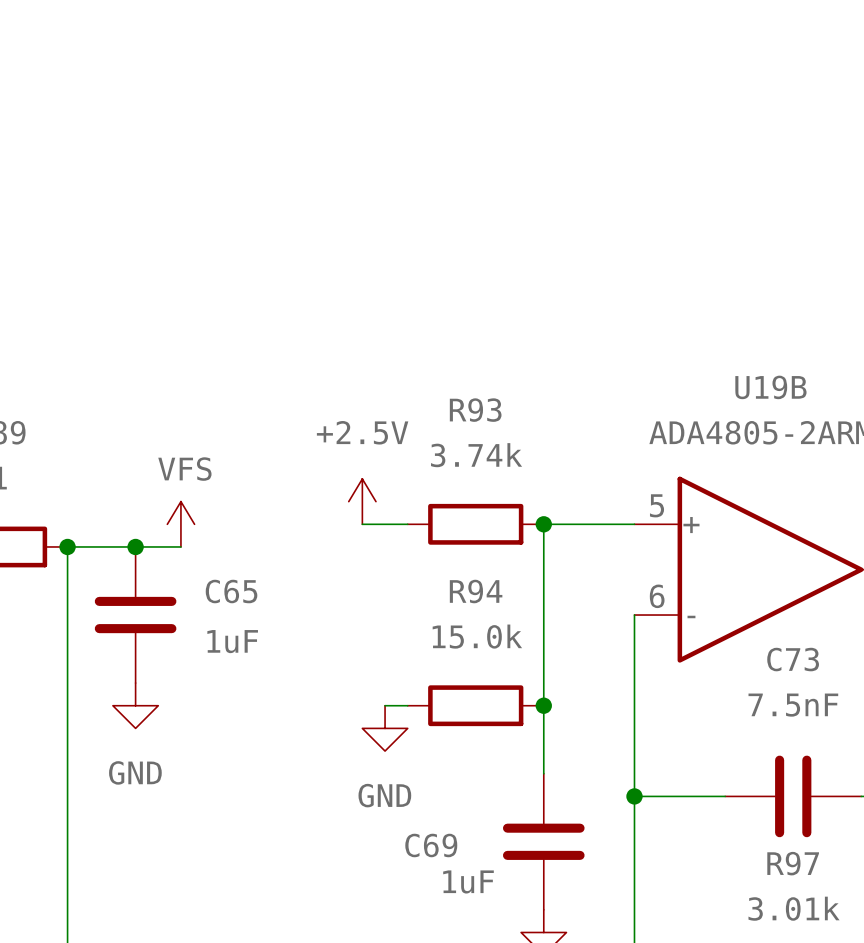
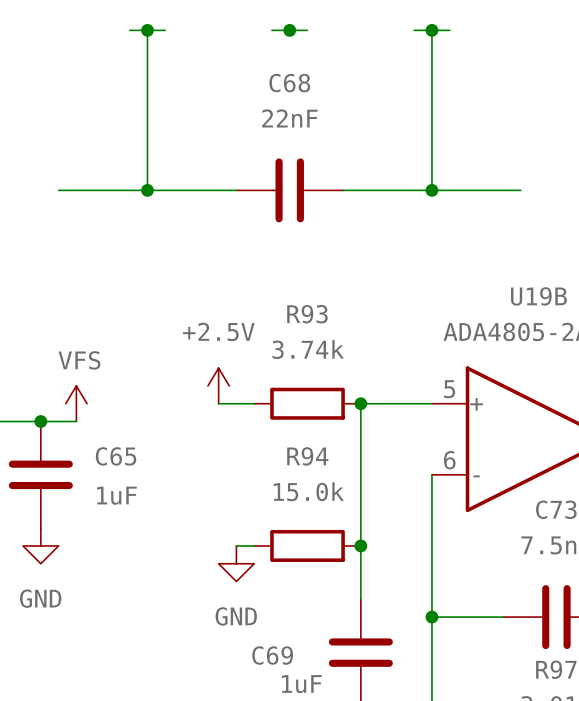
wire: none -> (129, 30) (165, 30)
wire: none -> (147, 30) (147, 190)
junction: none -> (147, 30)
wire: none -> (271, 30) (307, 30)
junction: none -> (289, 30)
wire: none -> (414, 30) (449, 30)
wire: none -> (431, 30) (431, 190)
junction: none -> (431, 30)
wire: none -> (58, 190) (236, 190)
junction: none -> (147, 190)
C68: none -> 22nF (289, 190)
wire: none -> (343, 190) (520, 190)
junction: none -> (431, 190)

